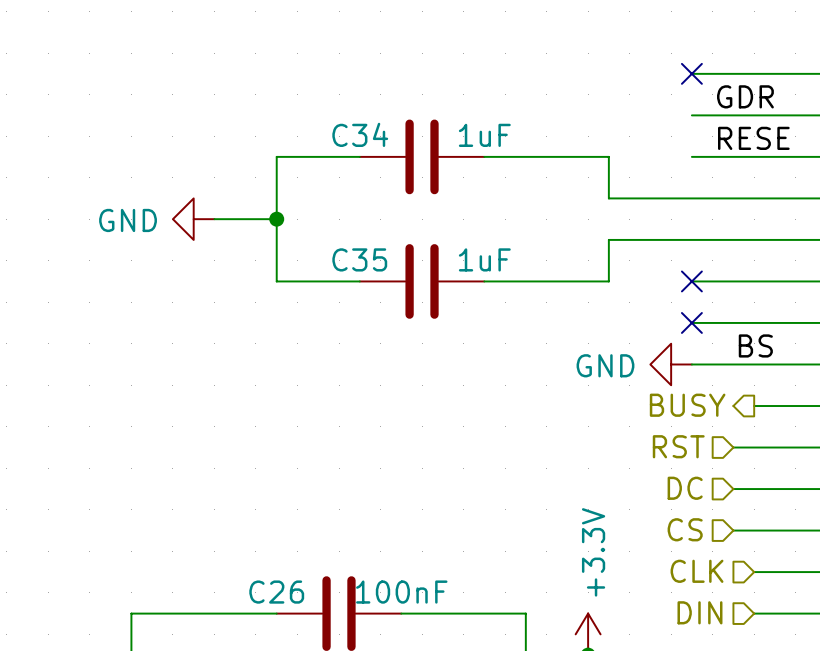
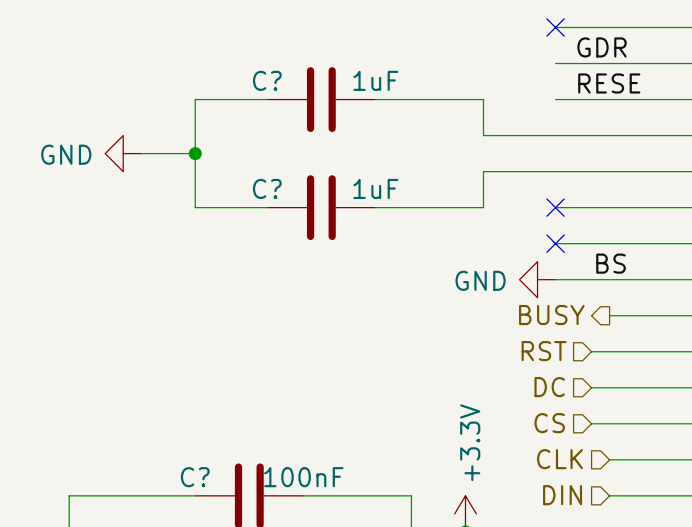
C34 name: C34 (360, 134) -> C? (267, 80)
C35 name: C35 (359, 259) -> C? (267, 188)
C26 name: C26 (276, 592) -> C? (195, 477)

